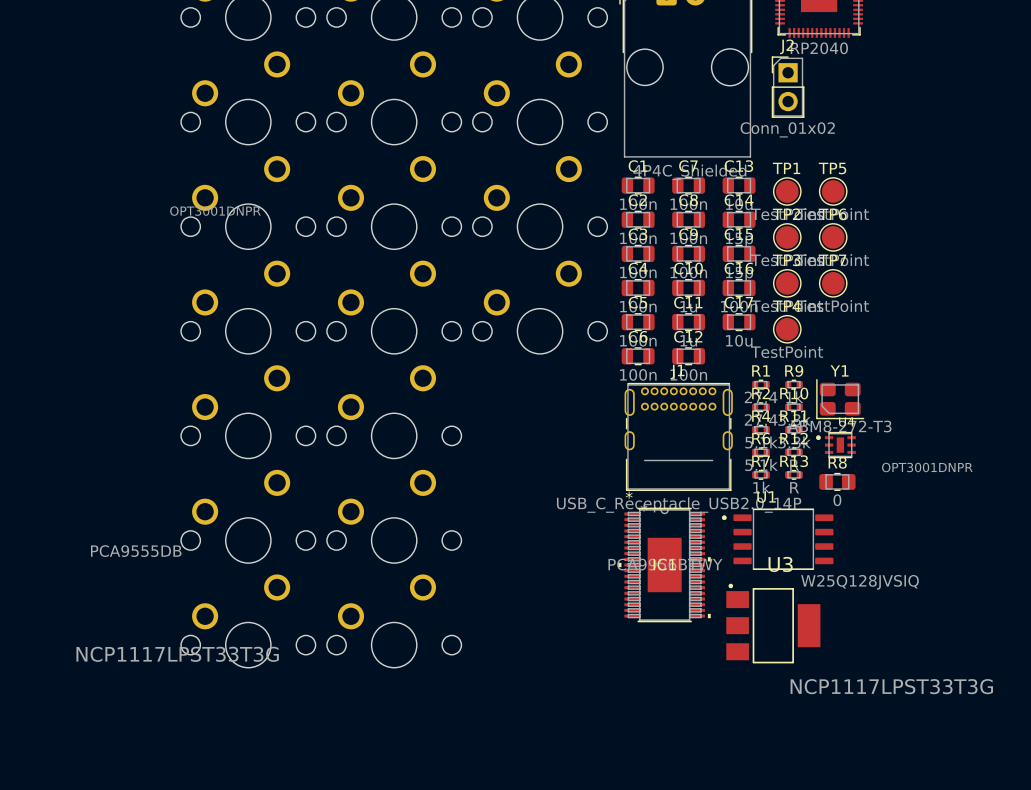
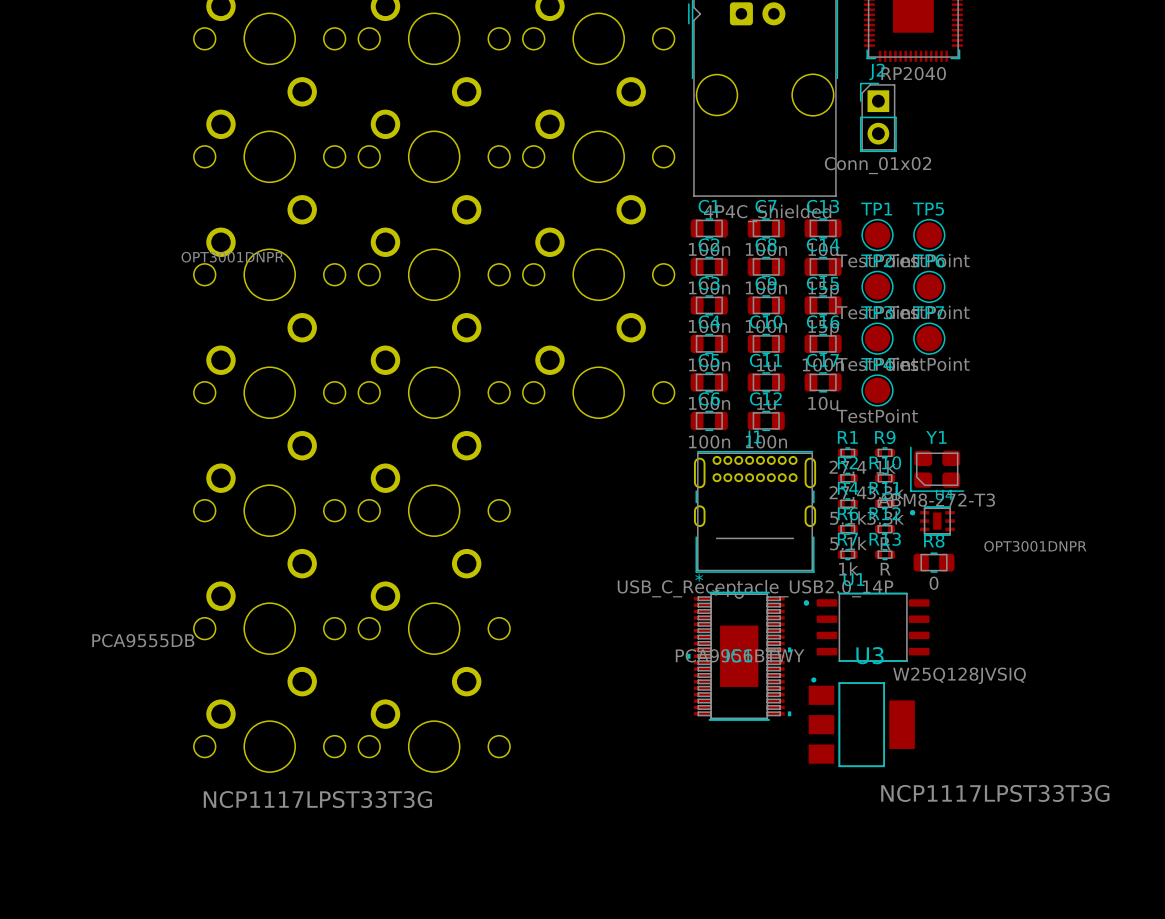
part value position: NCP1117LPST33T3G (177, 654) -> NCP1117LPST33T3G (317, 799)

